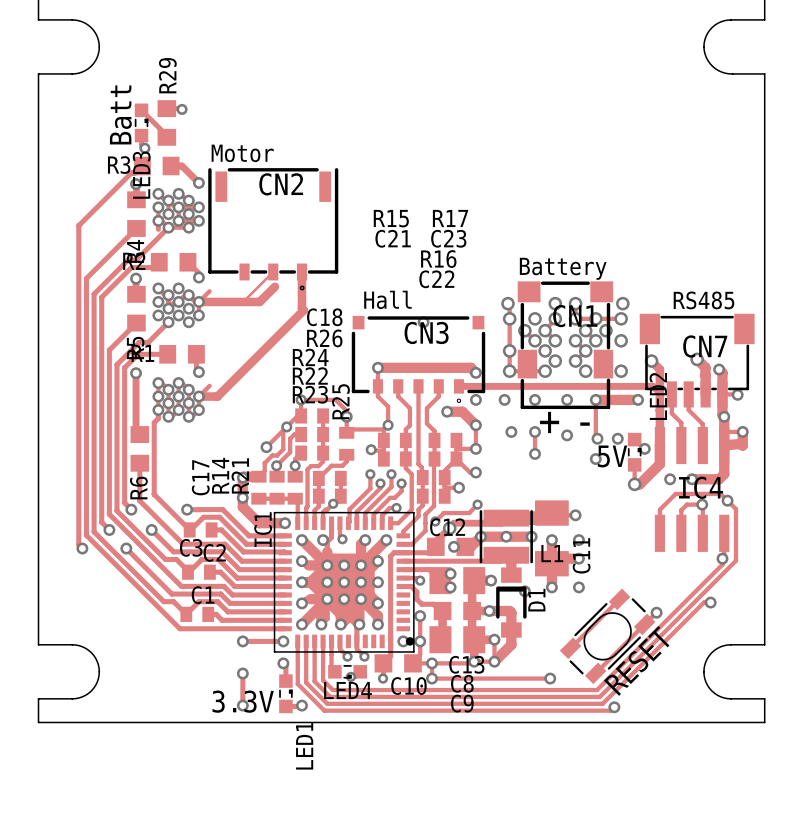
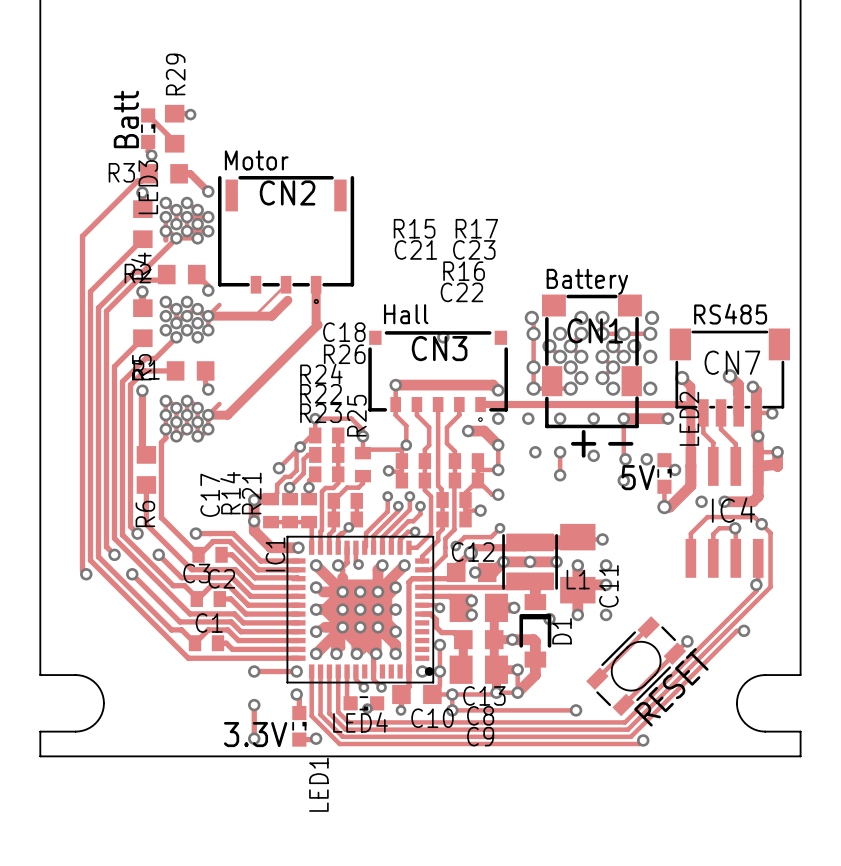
board edge: (38, 19) (72, 19) (82, 21) (93, 30) (99, 46) (93, 63) (82, 71) (72, 73) (38, 73) -> (40, 20) (40, 77)
board edge: (764, 19) (730, 19) (720, 21) (709, 30) (703, 46) (710, 63) (721, 72) (764, 73) -> (800, 20) (800, 77)

